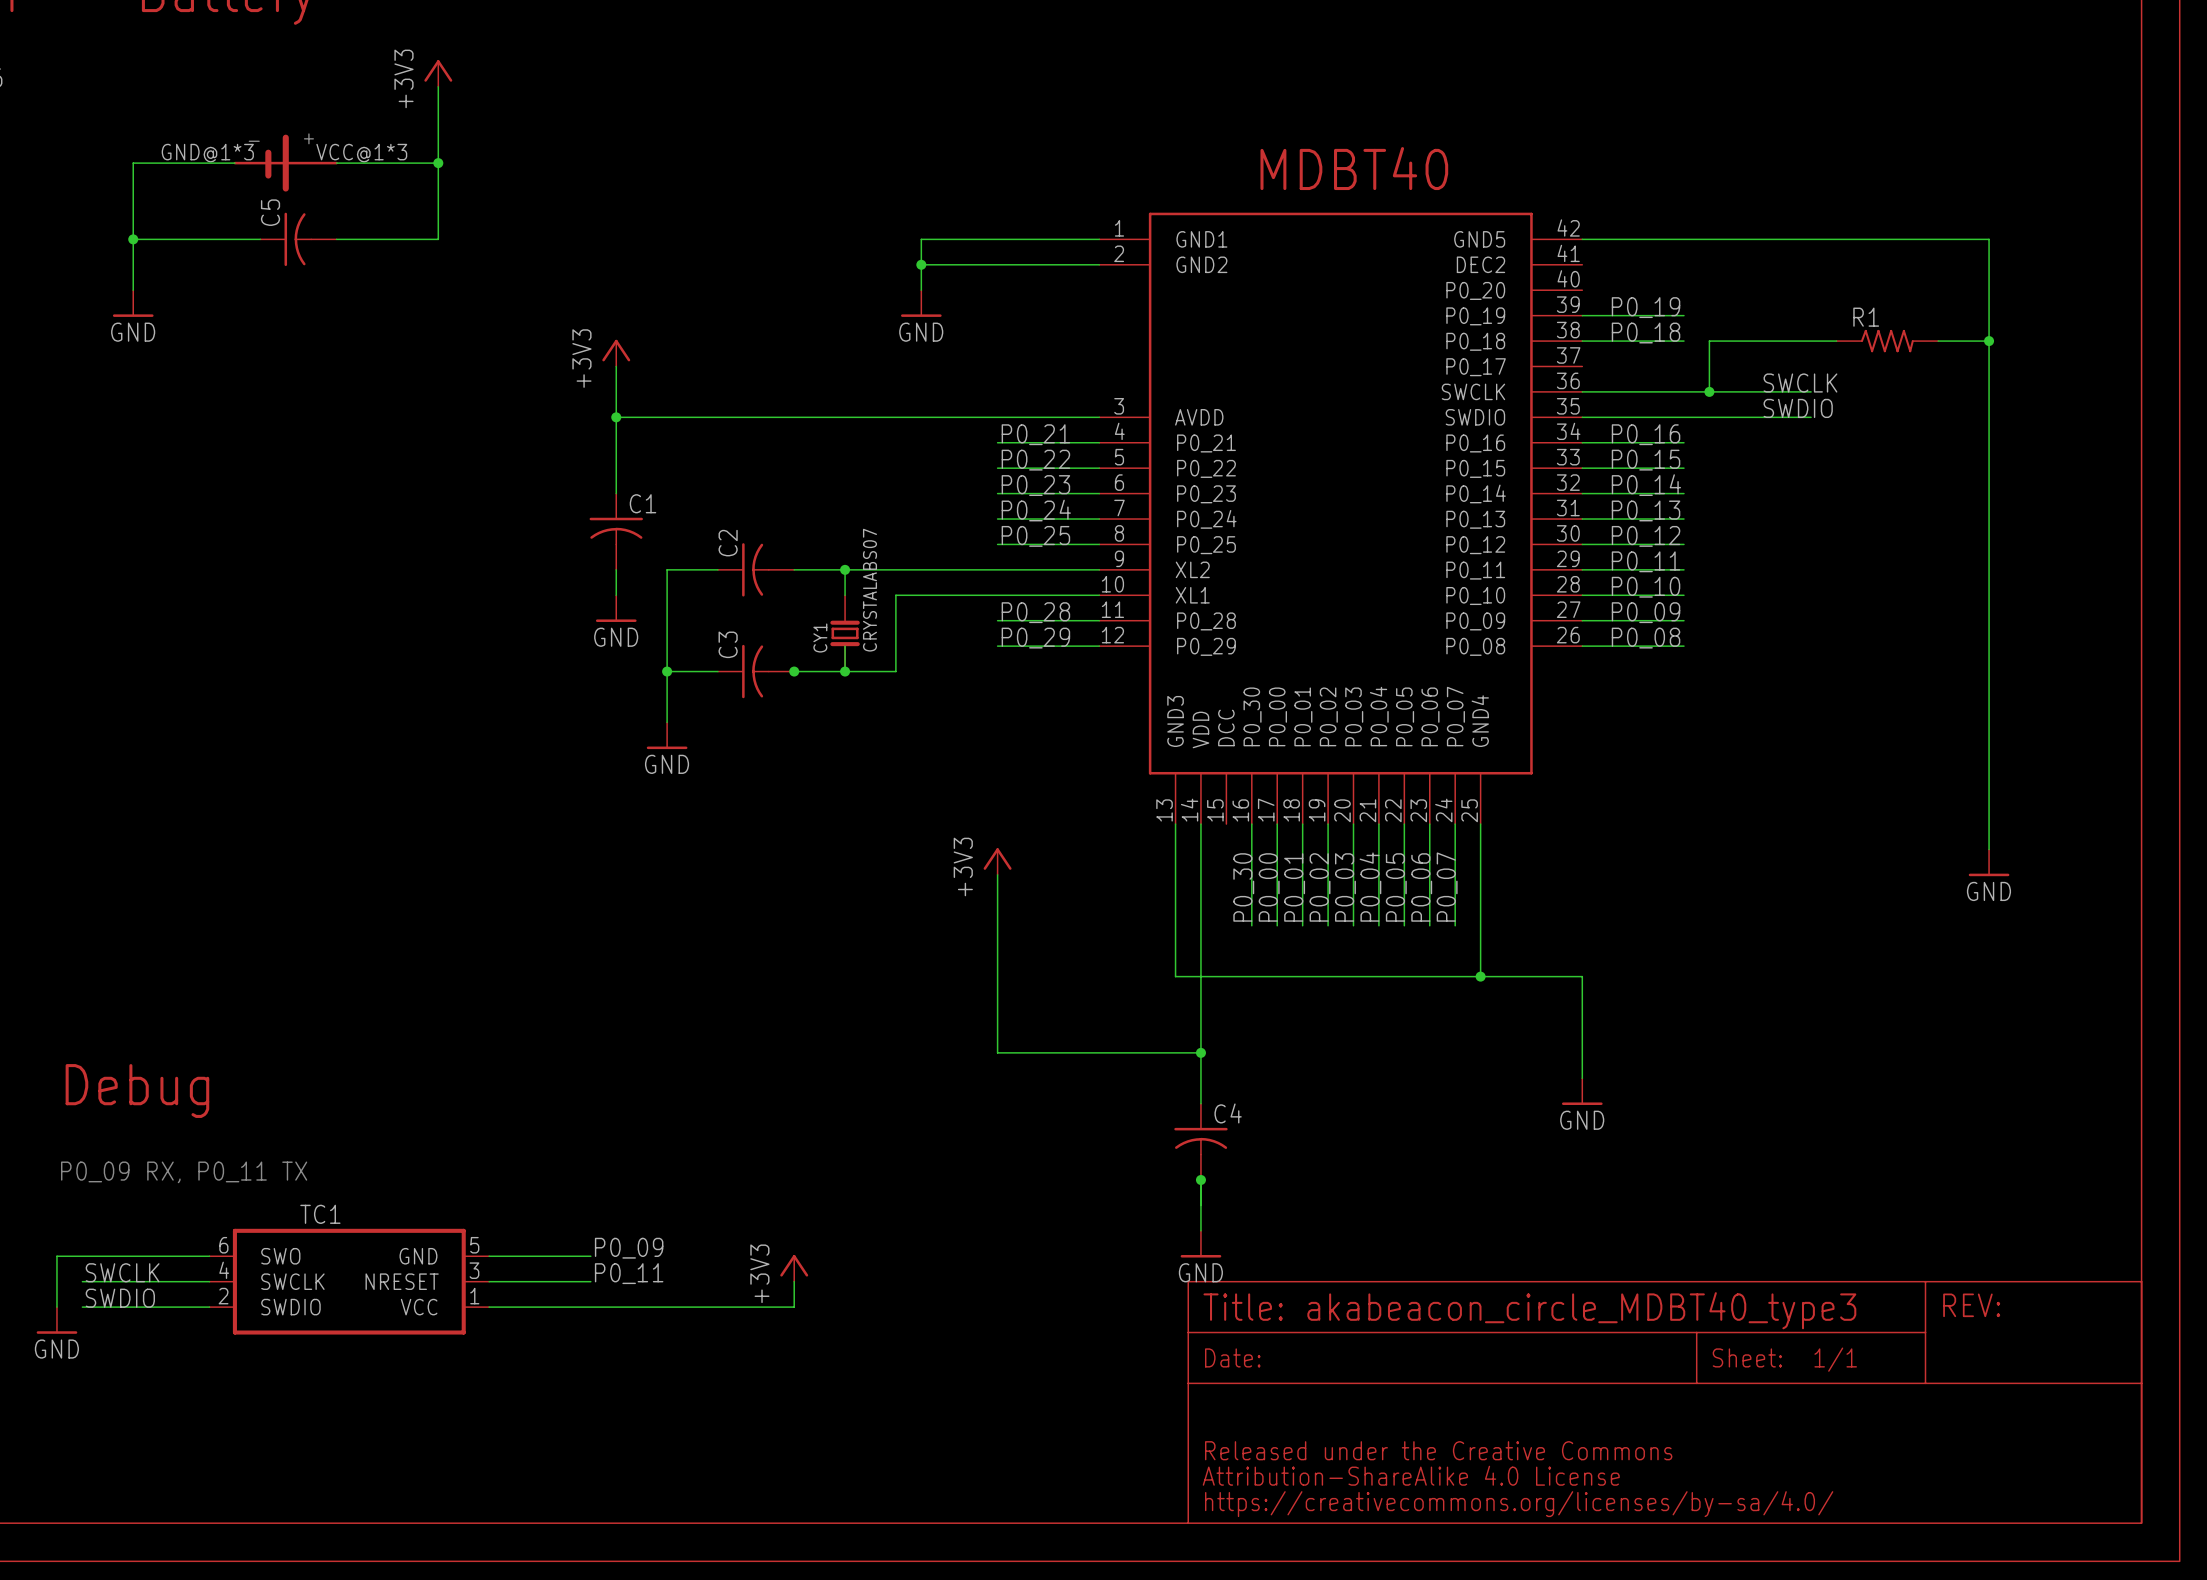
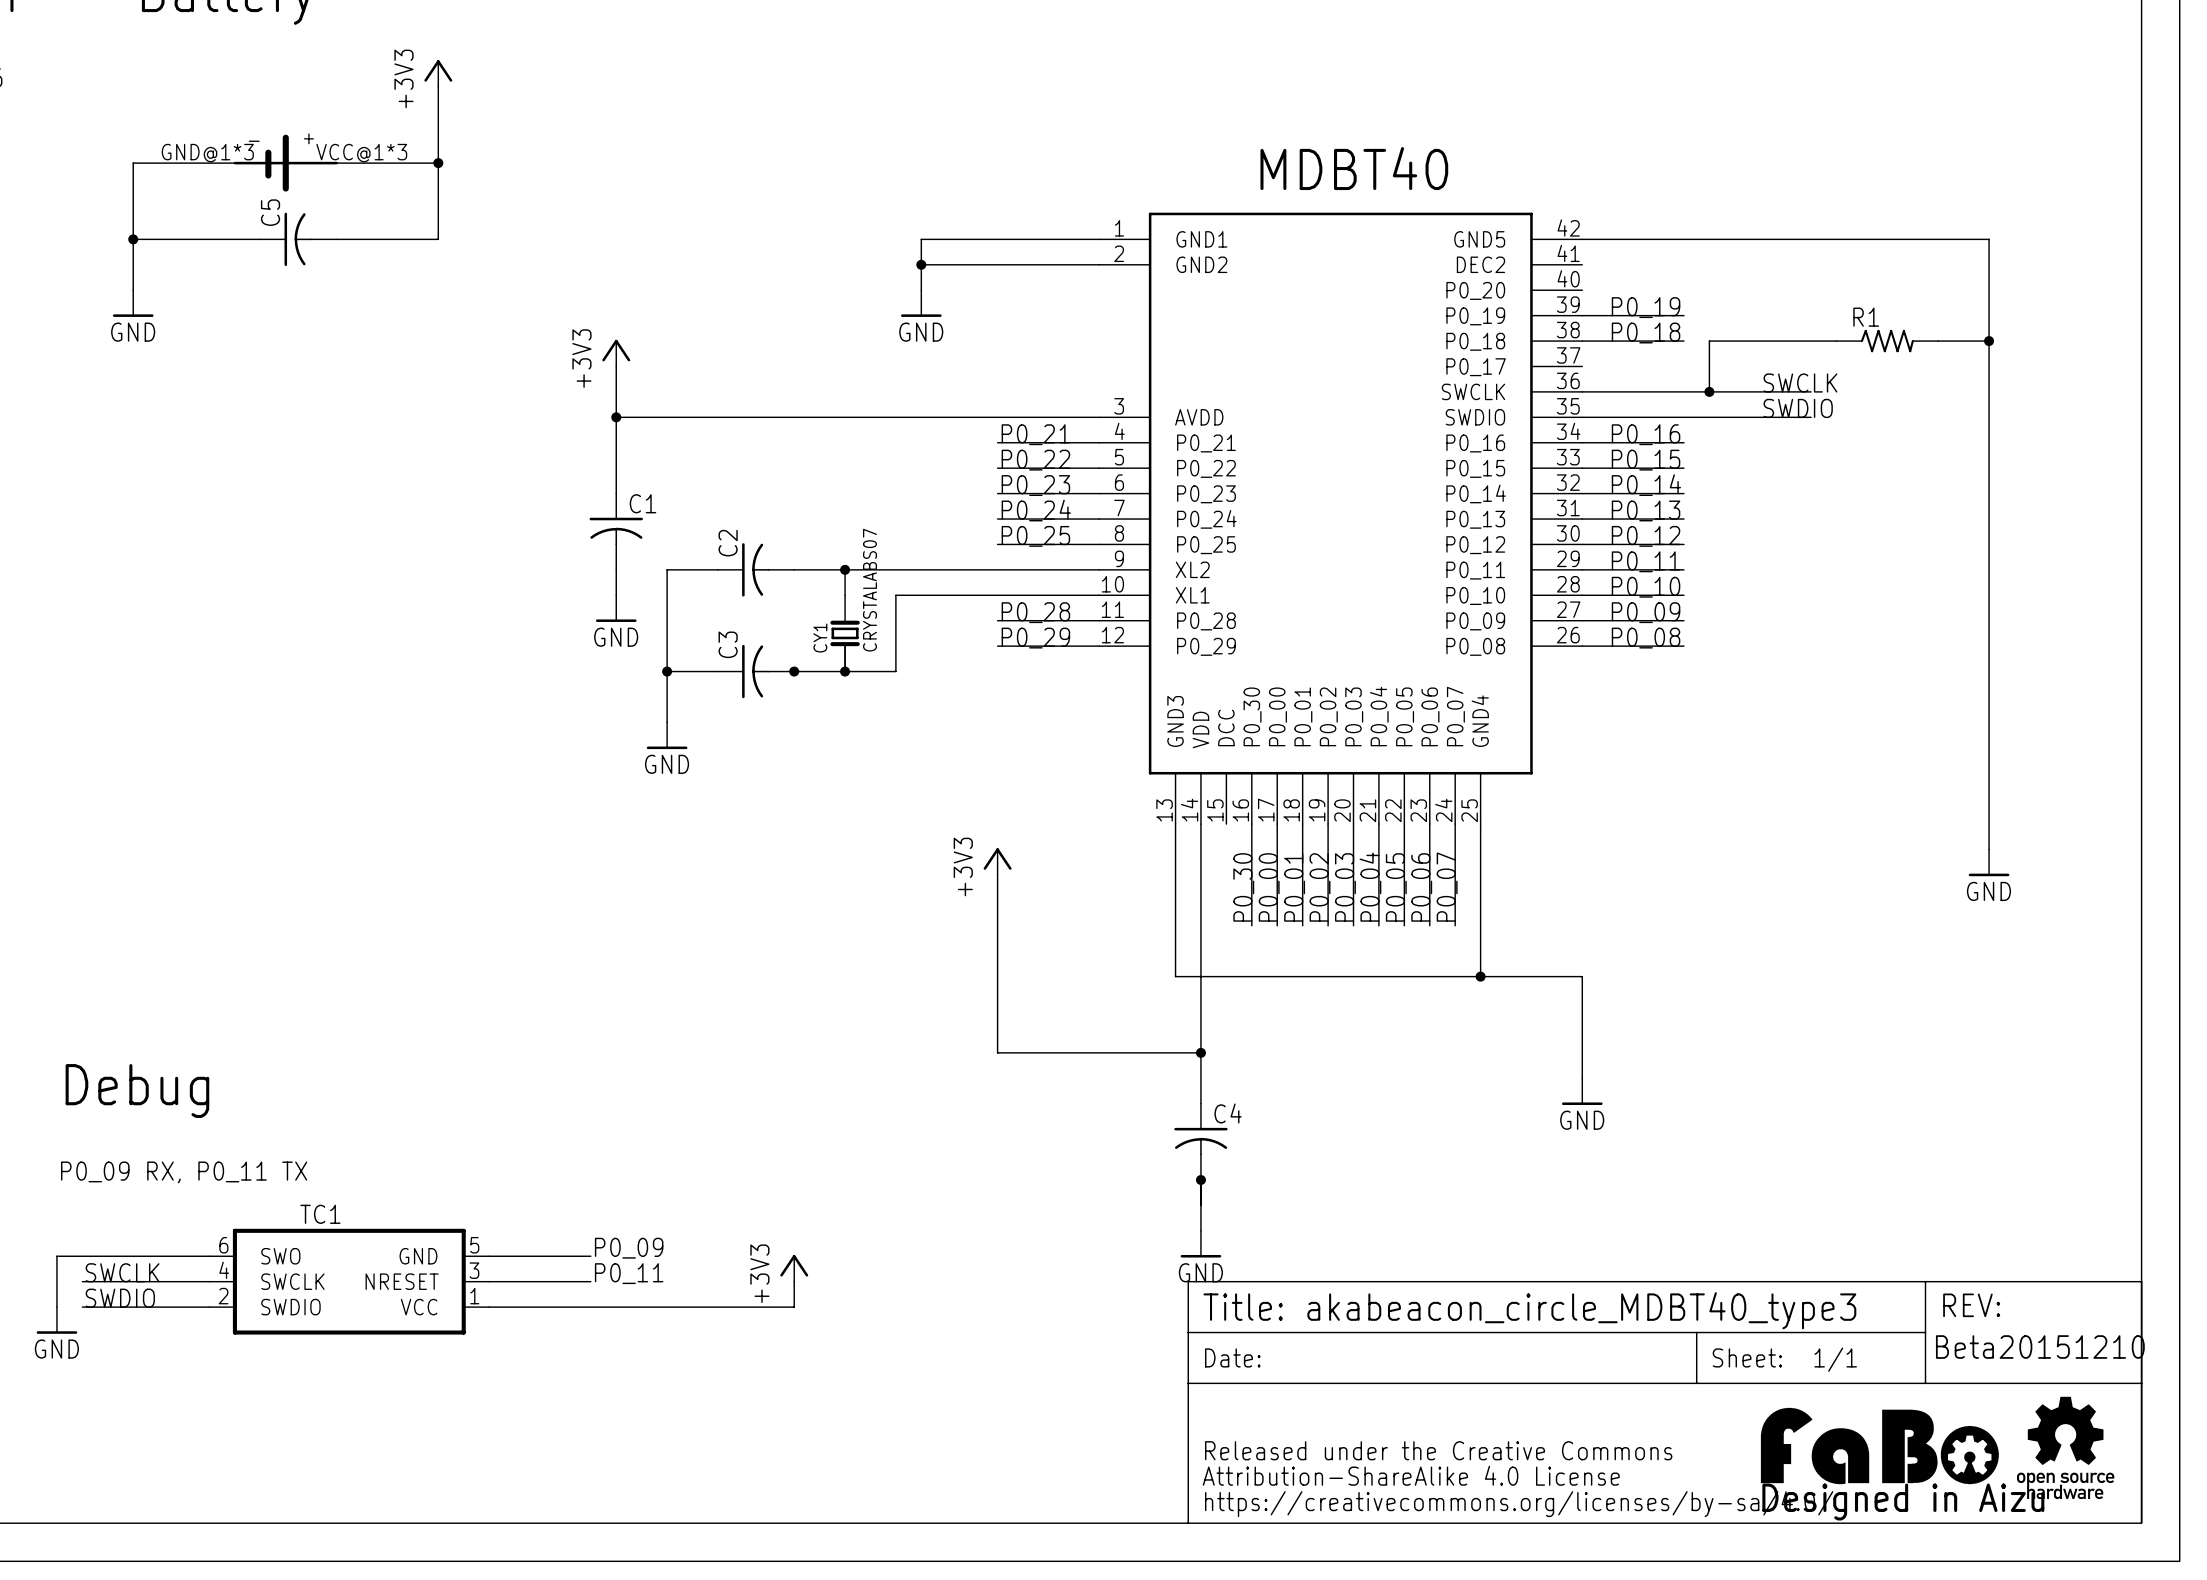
text: none -> Beta20151210 (2040, 1347)
part: none -> (1879, 1446)
part: none -> (2065, 1447)

